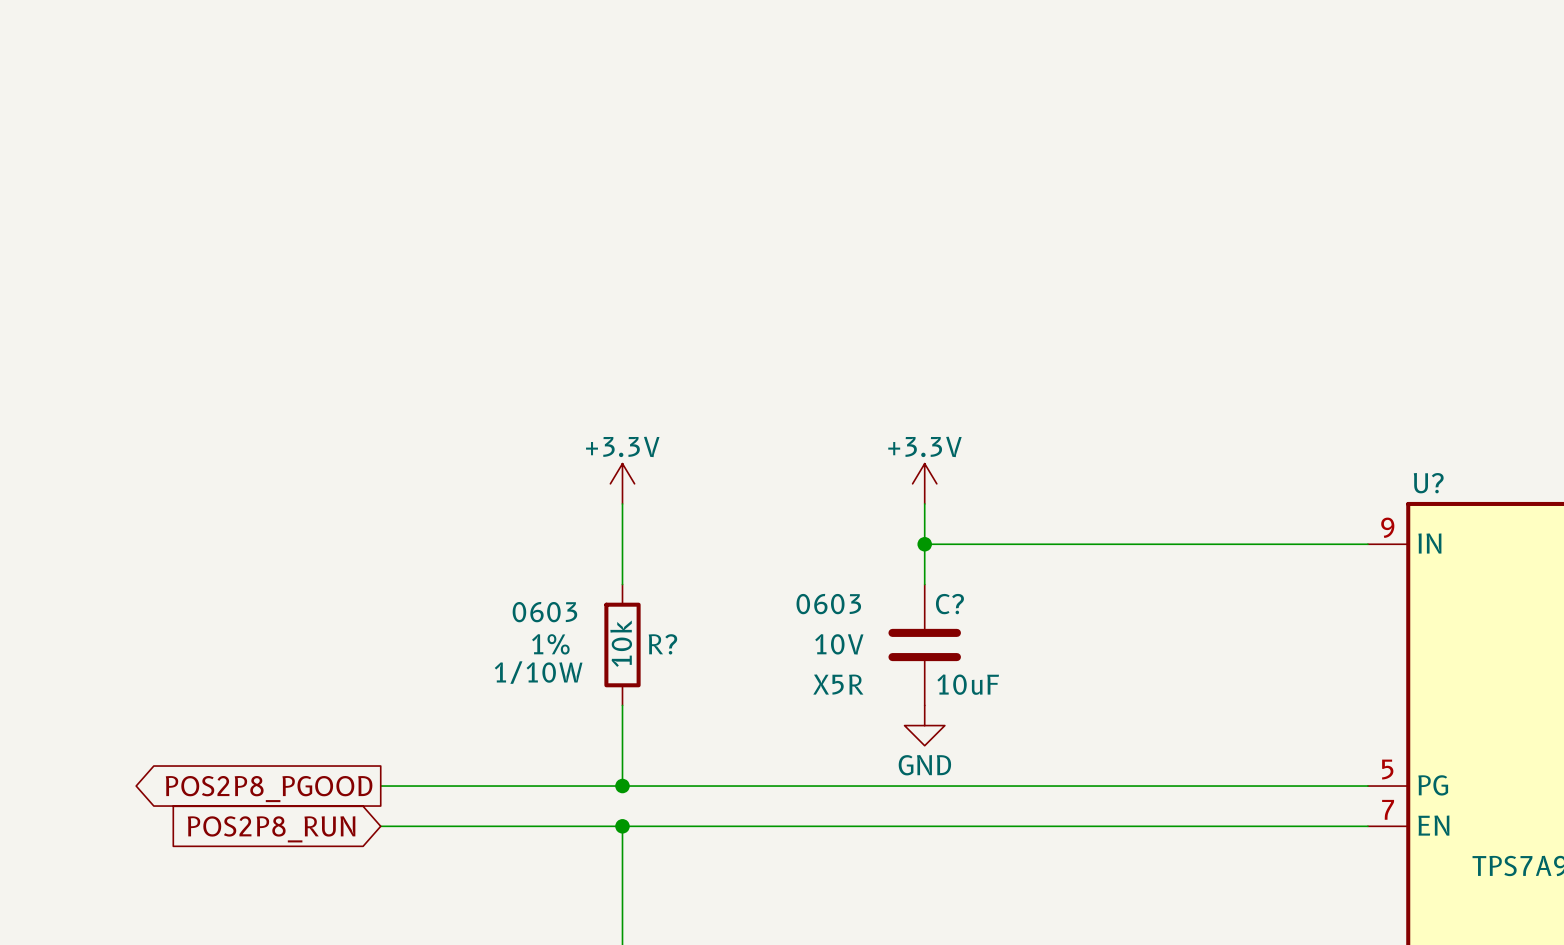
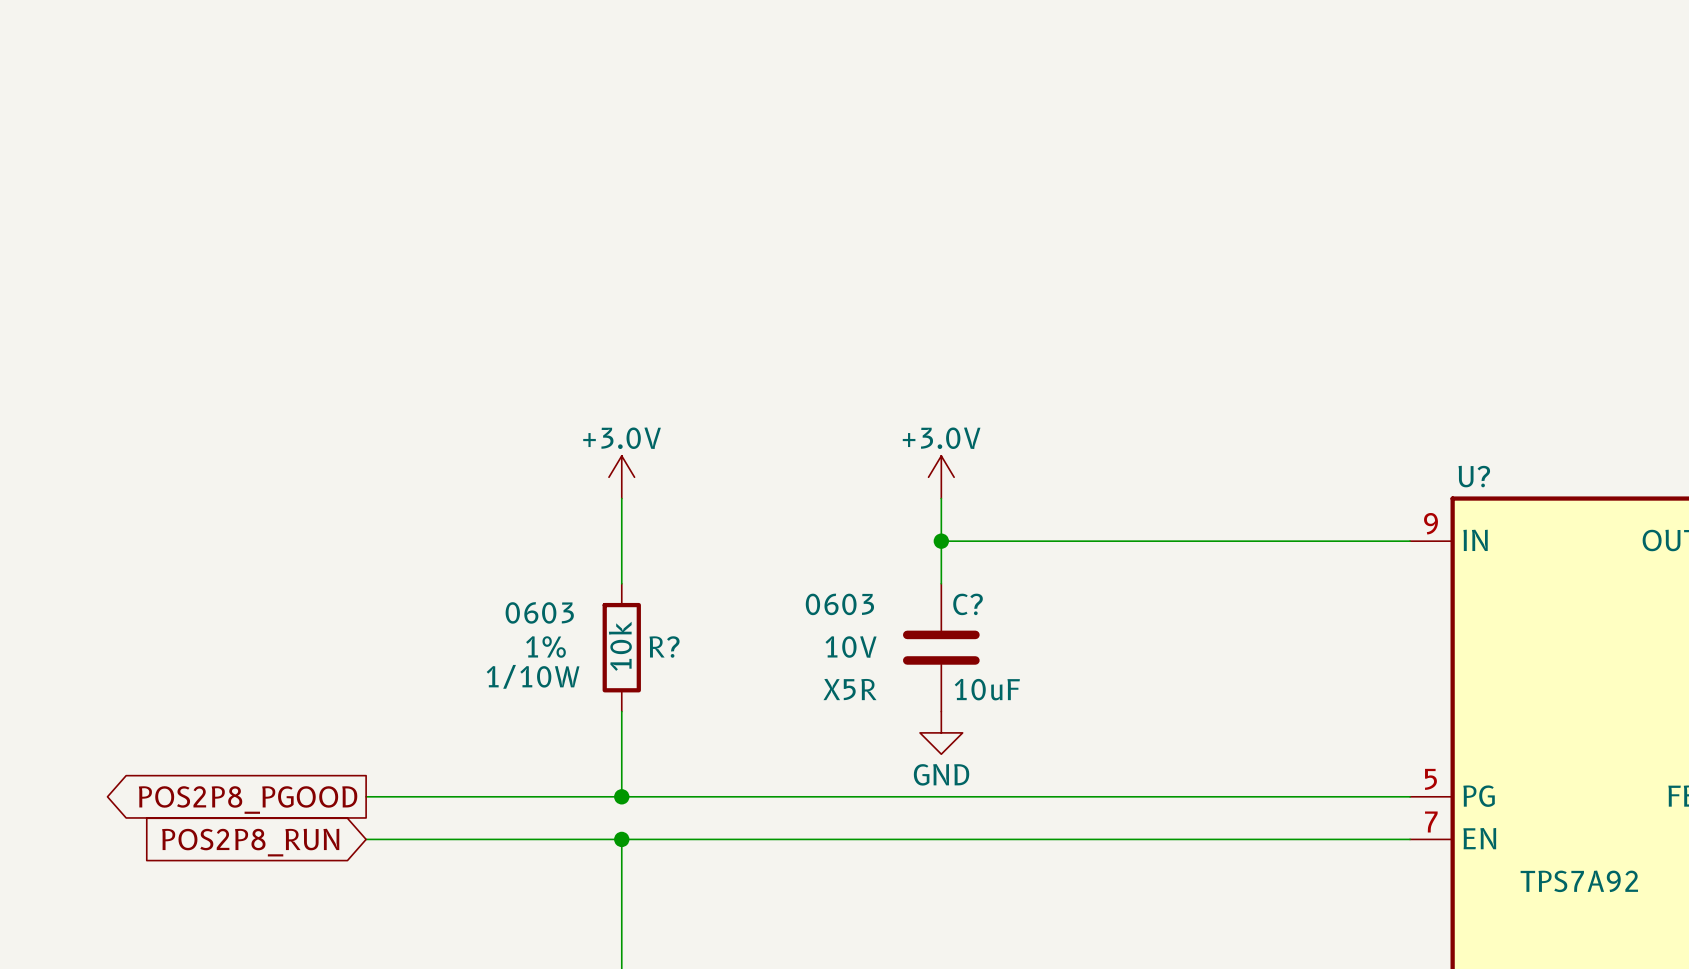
power symbol: +3.3V (622, 483) -> +3.0V (621, 477)
power symbol: +3.3V (924, 483) -> +3.0V (941, 477)

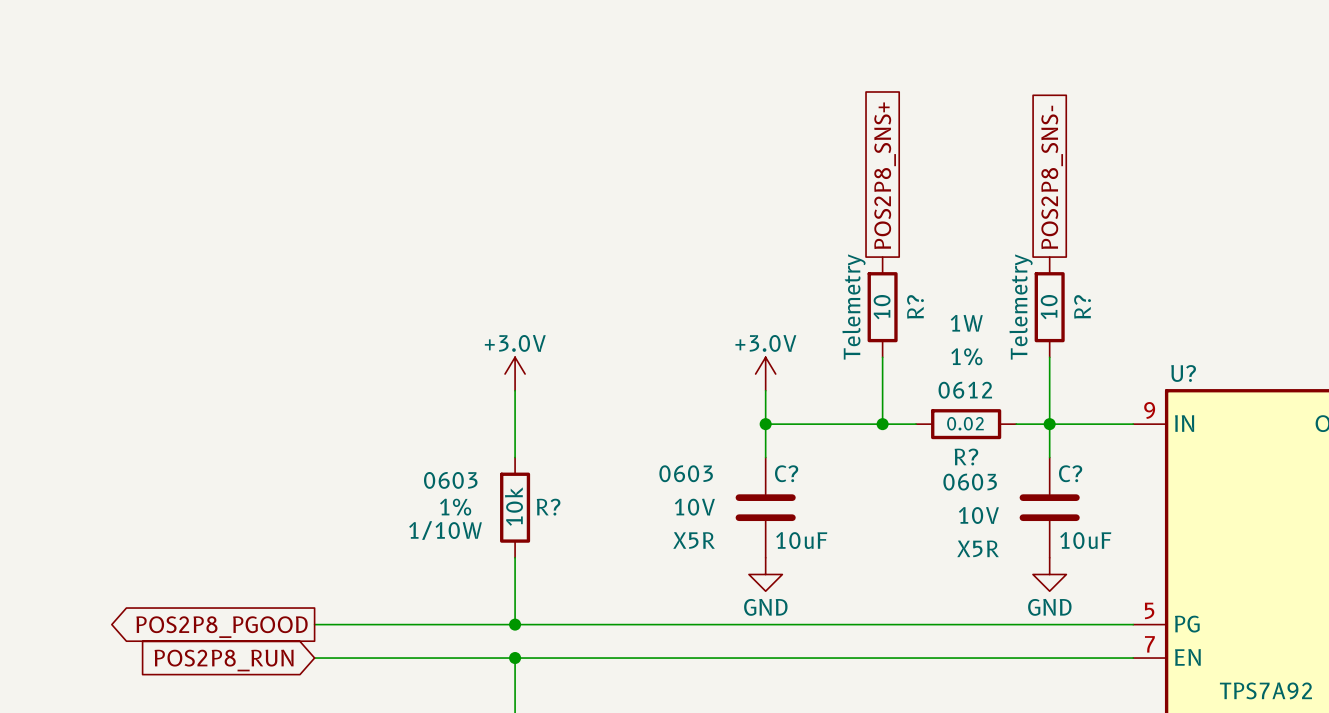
global label: none -> POS2P8_SNS+ (885, 175)
global label: none -> POS2P8_SNS- (1052, 177)
R?: none -> 10 (882, 307)
R?: none -> 10 (1049, 307)
wire: none -> (882, 357) (882, 424)
wire: none -> (1049, 357) (1049, 457)
junction: none -> (882, 424)
wire: (1133, 541) (1260, 541) -> none
R?: none -> 0.02 (966, 424)
junction: none -> (1049, 424)
C?: none -> 10uF (1049, 507)
power symbol: none -> GND (1049, 574)

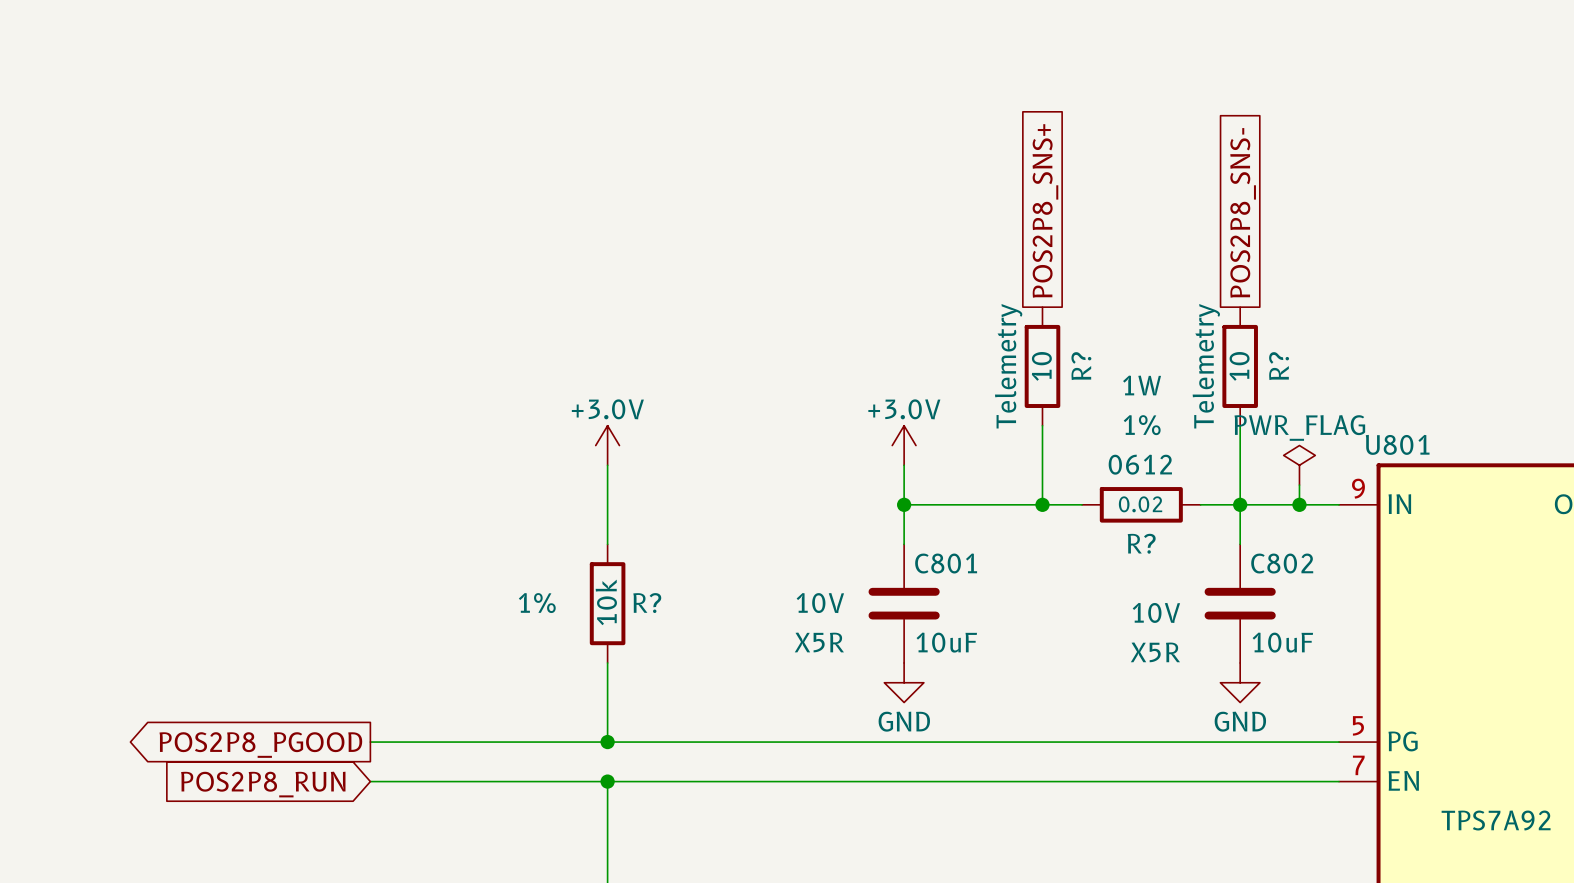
U? name: U? (1183, 373) -> U801 (1397, 444)
power symbol: none -> PWR_FLAG (1299, 465)
wire: none -> (1299, 485) (1299, 504)
junction: none -> (1299, 504)
C? text: 0603 (686, 473) -> none
C? name: C? (786, 473) -> C801 (946, 563)
C? name: C? (1070, 473) -> C802 (1282, 563)
R? text: 0603 (450, 480) -> none
C? text: 0603 (970, 482) -> none
R? text: 1/10W (445, 530) -> none

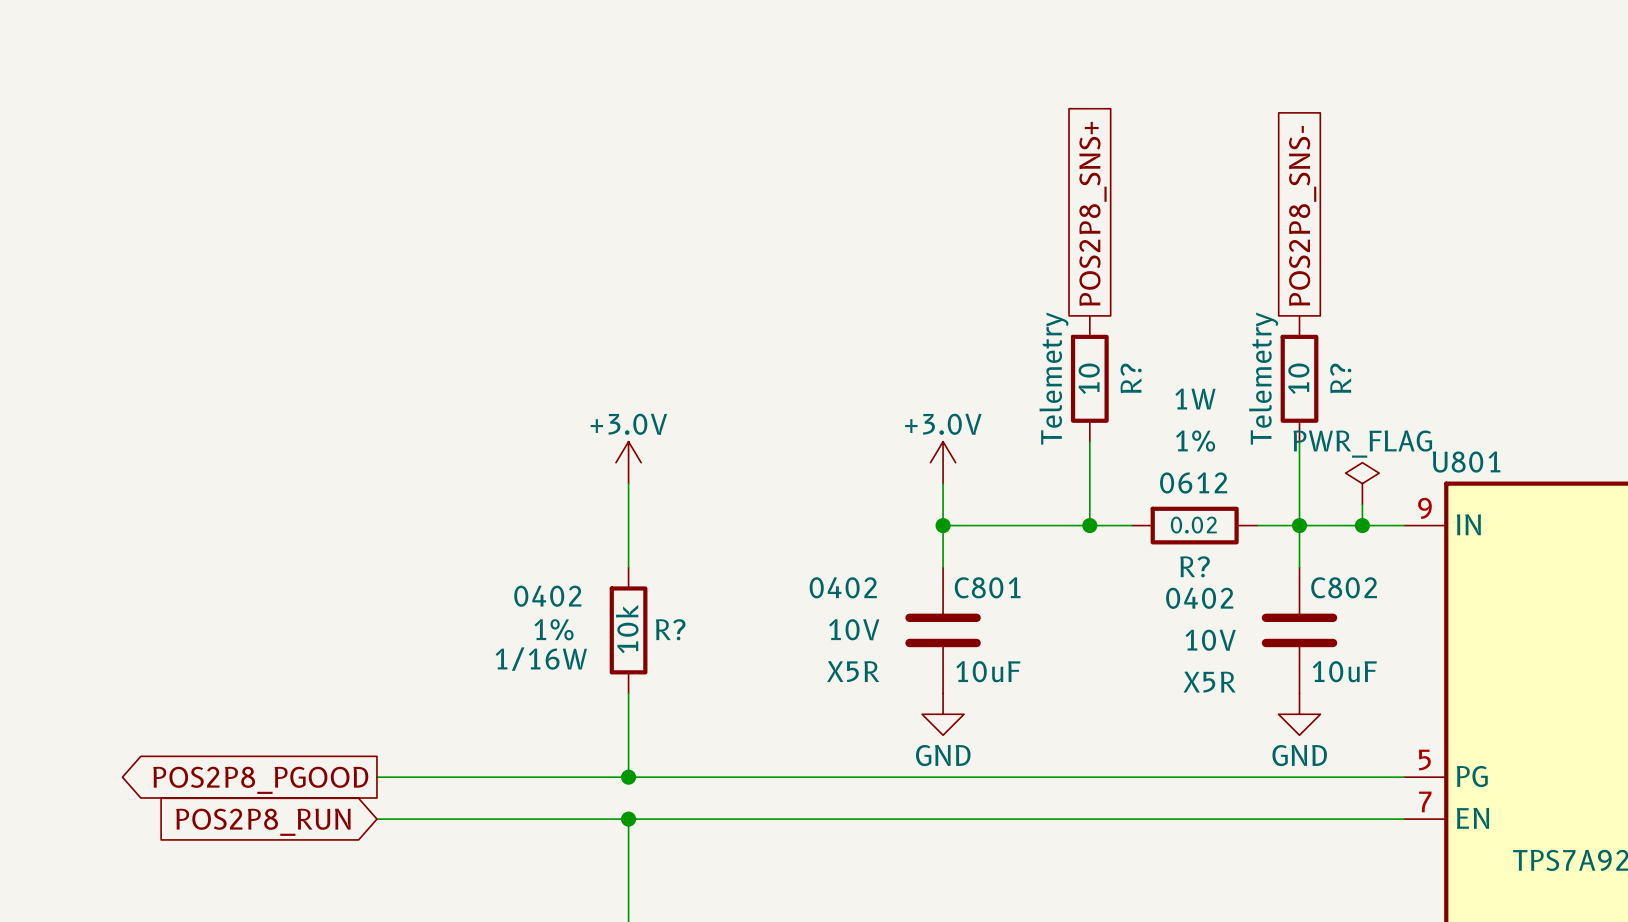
C801 text: none -> 0402 (843, 587)
R? text: none -> 0402 (547, 596)
C802 text: none -> 0402 (1199, 598)
R? text: none -> 1/16W (541, 659)

